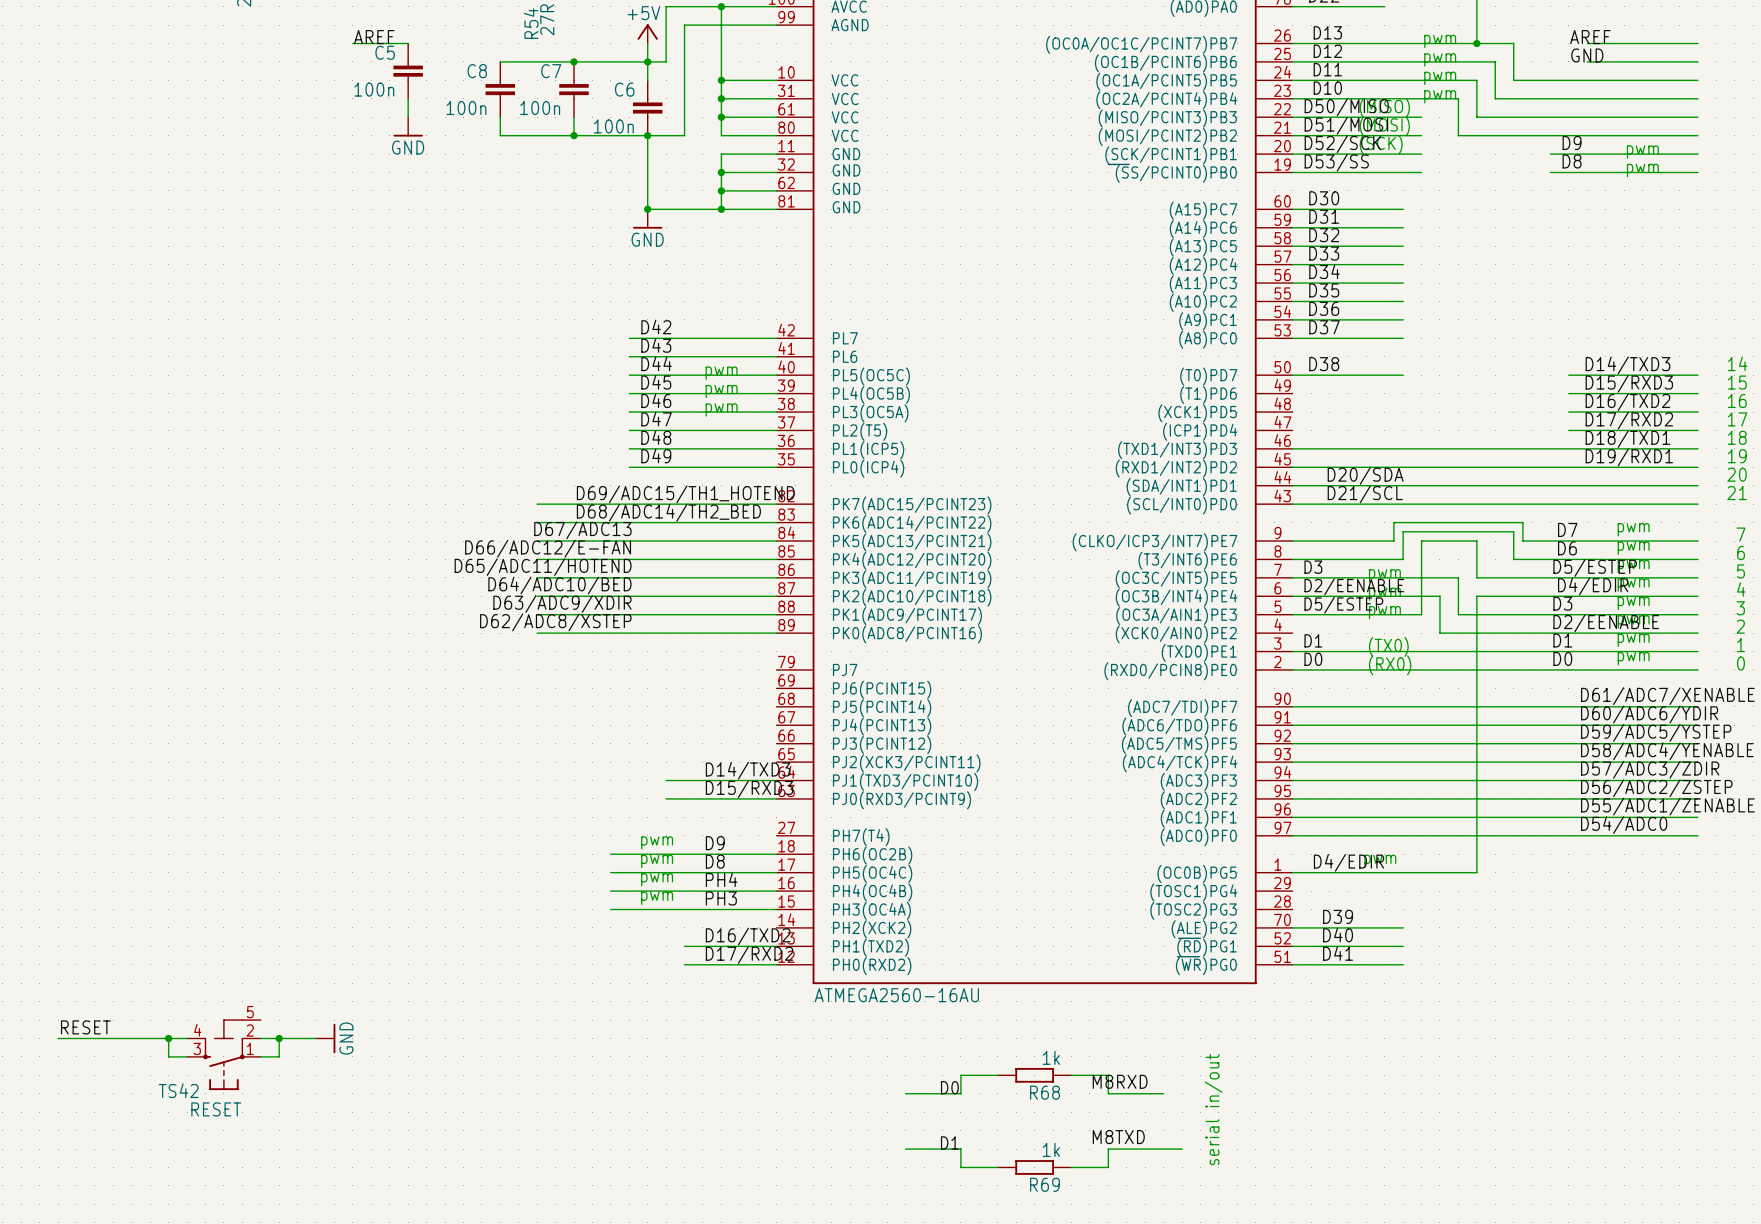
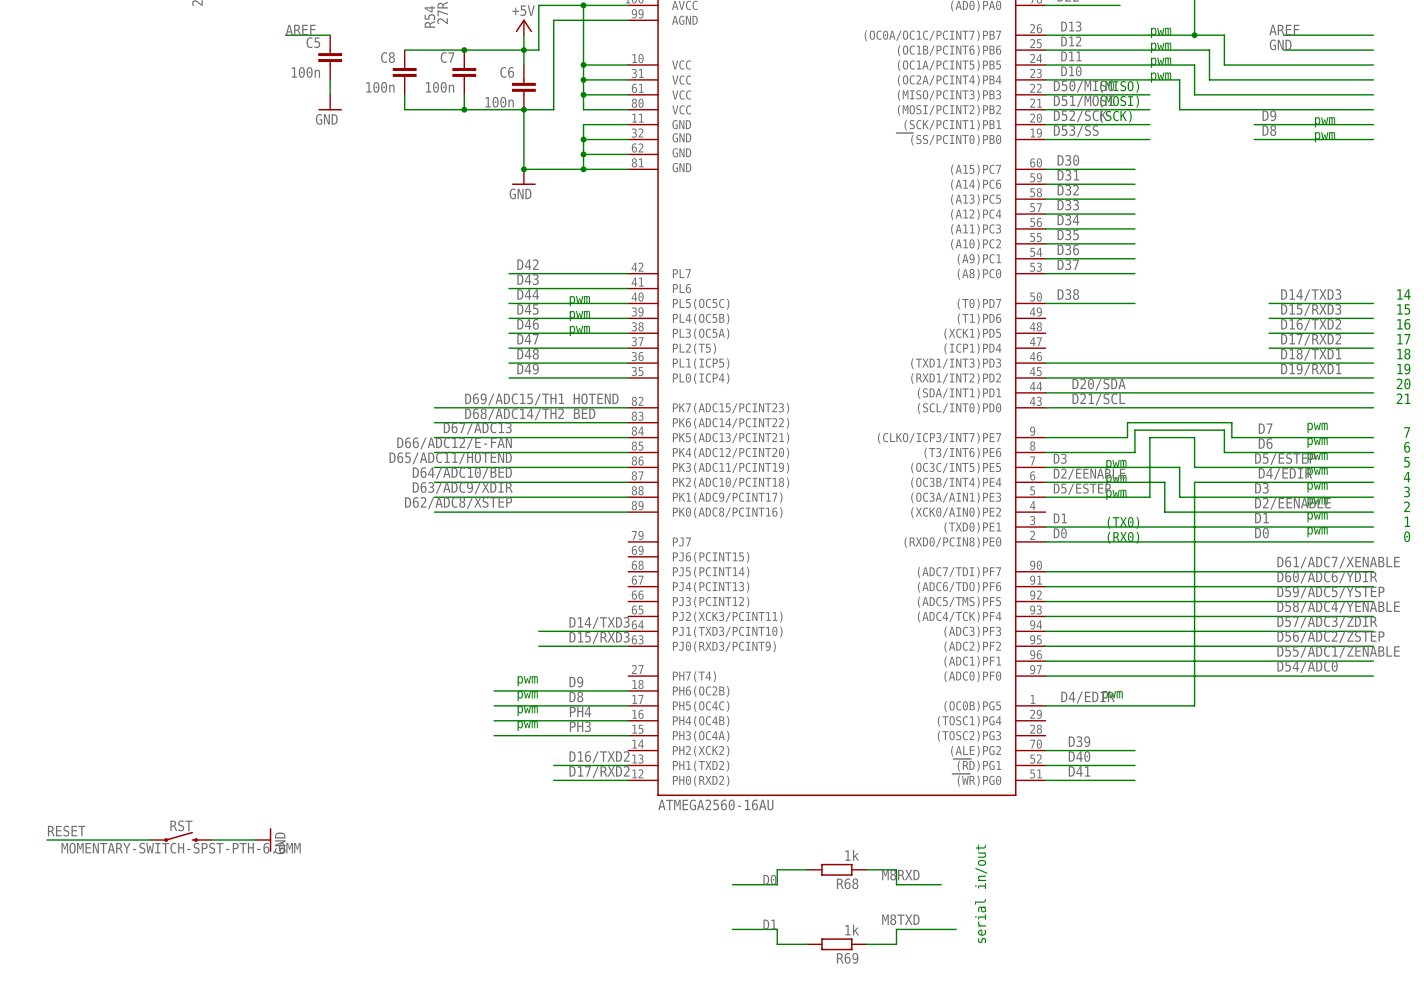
RST: none -> MOMENTARY-SWITCH-SPST-PTH-6.0MM (181, 836)
wire: (168, 1038) (168, 1056) (187, 1056) -> none
junction: (168, 1038) -> none
wire: (279, 1038) (279, 1056) (260, 1056) -> none
junction: (279, 1038) -> none
RESET: TS42 (223, 1054) -> none

